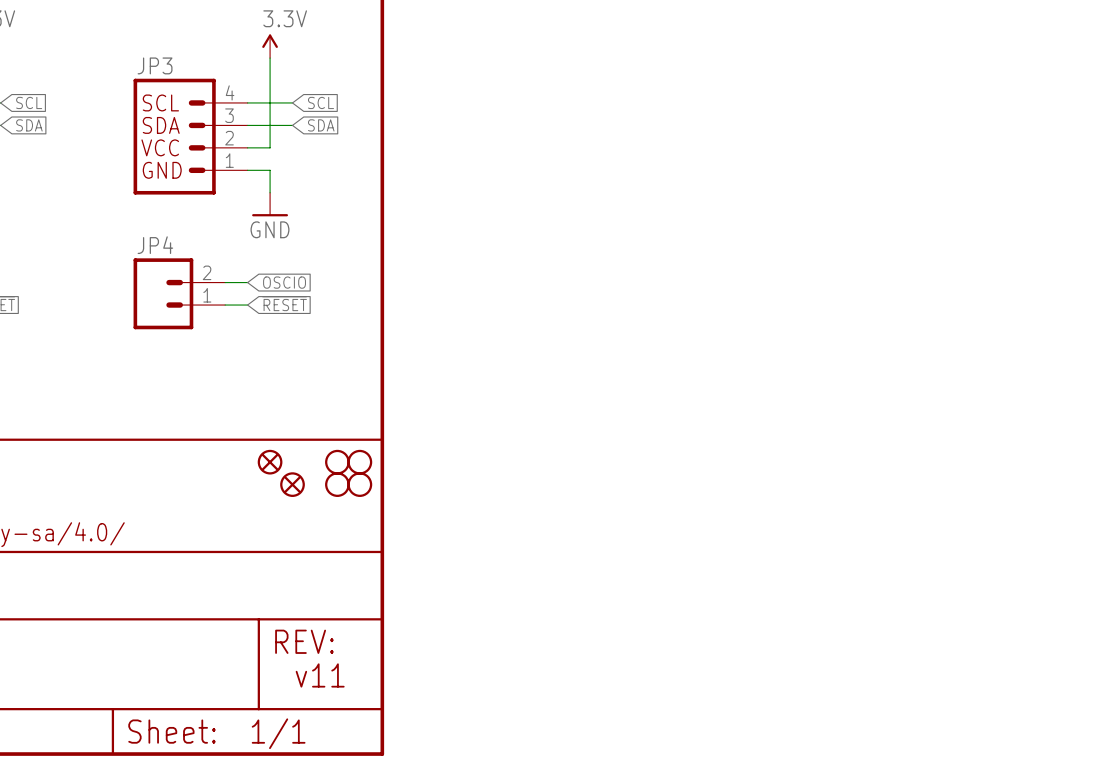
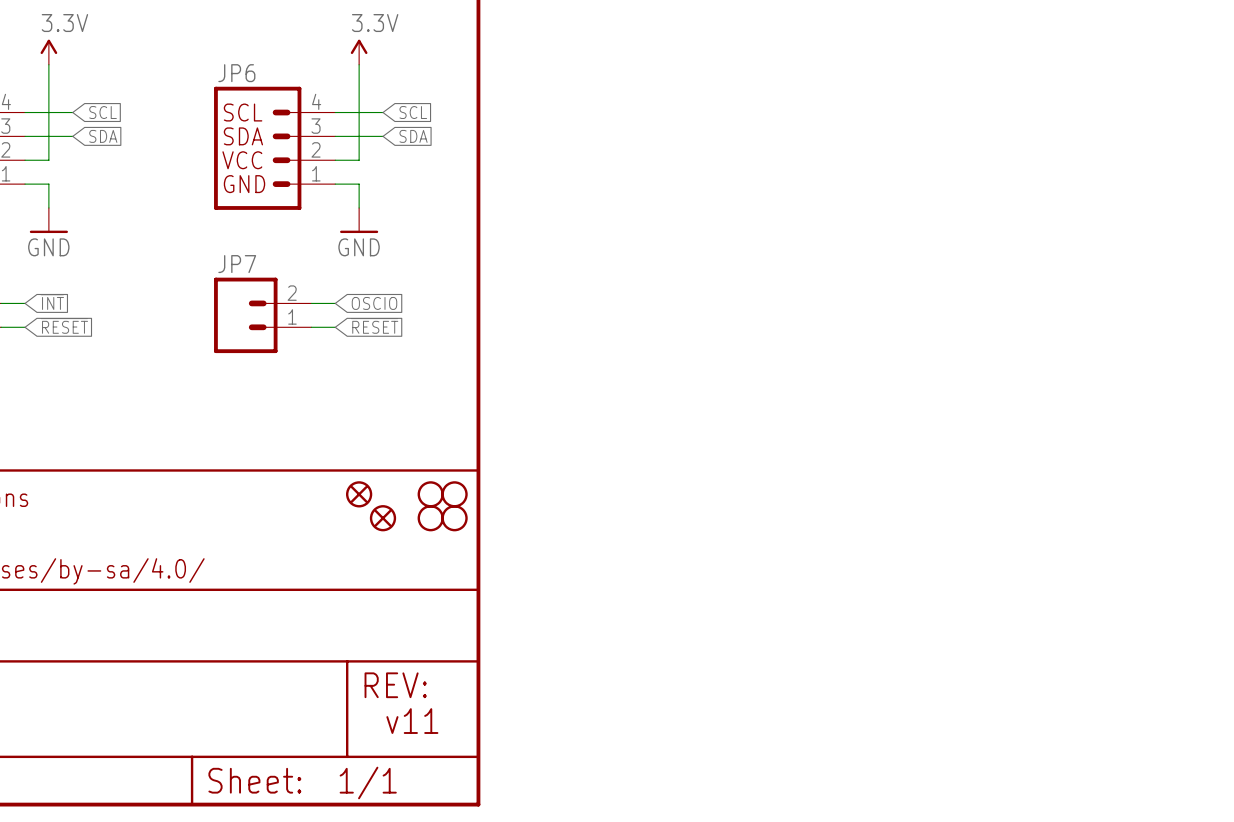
JP3 name: JP3 (155, 65) -> JP6 (236, 73)
JP4 name: JP4 (155, 245) -> JP7 (237, 264)

